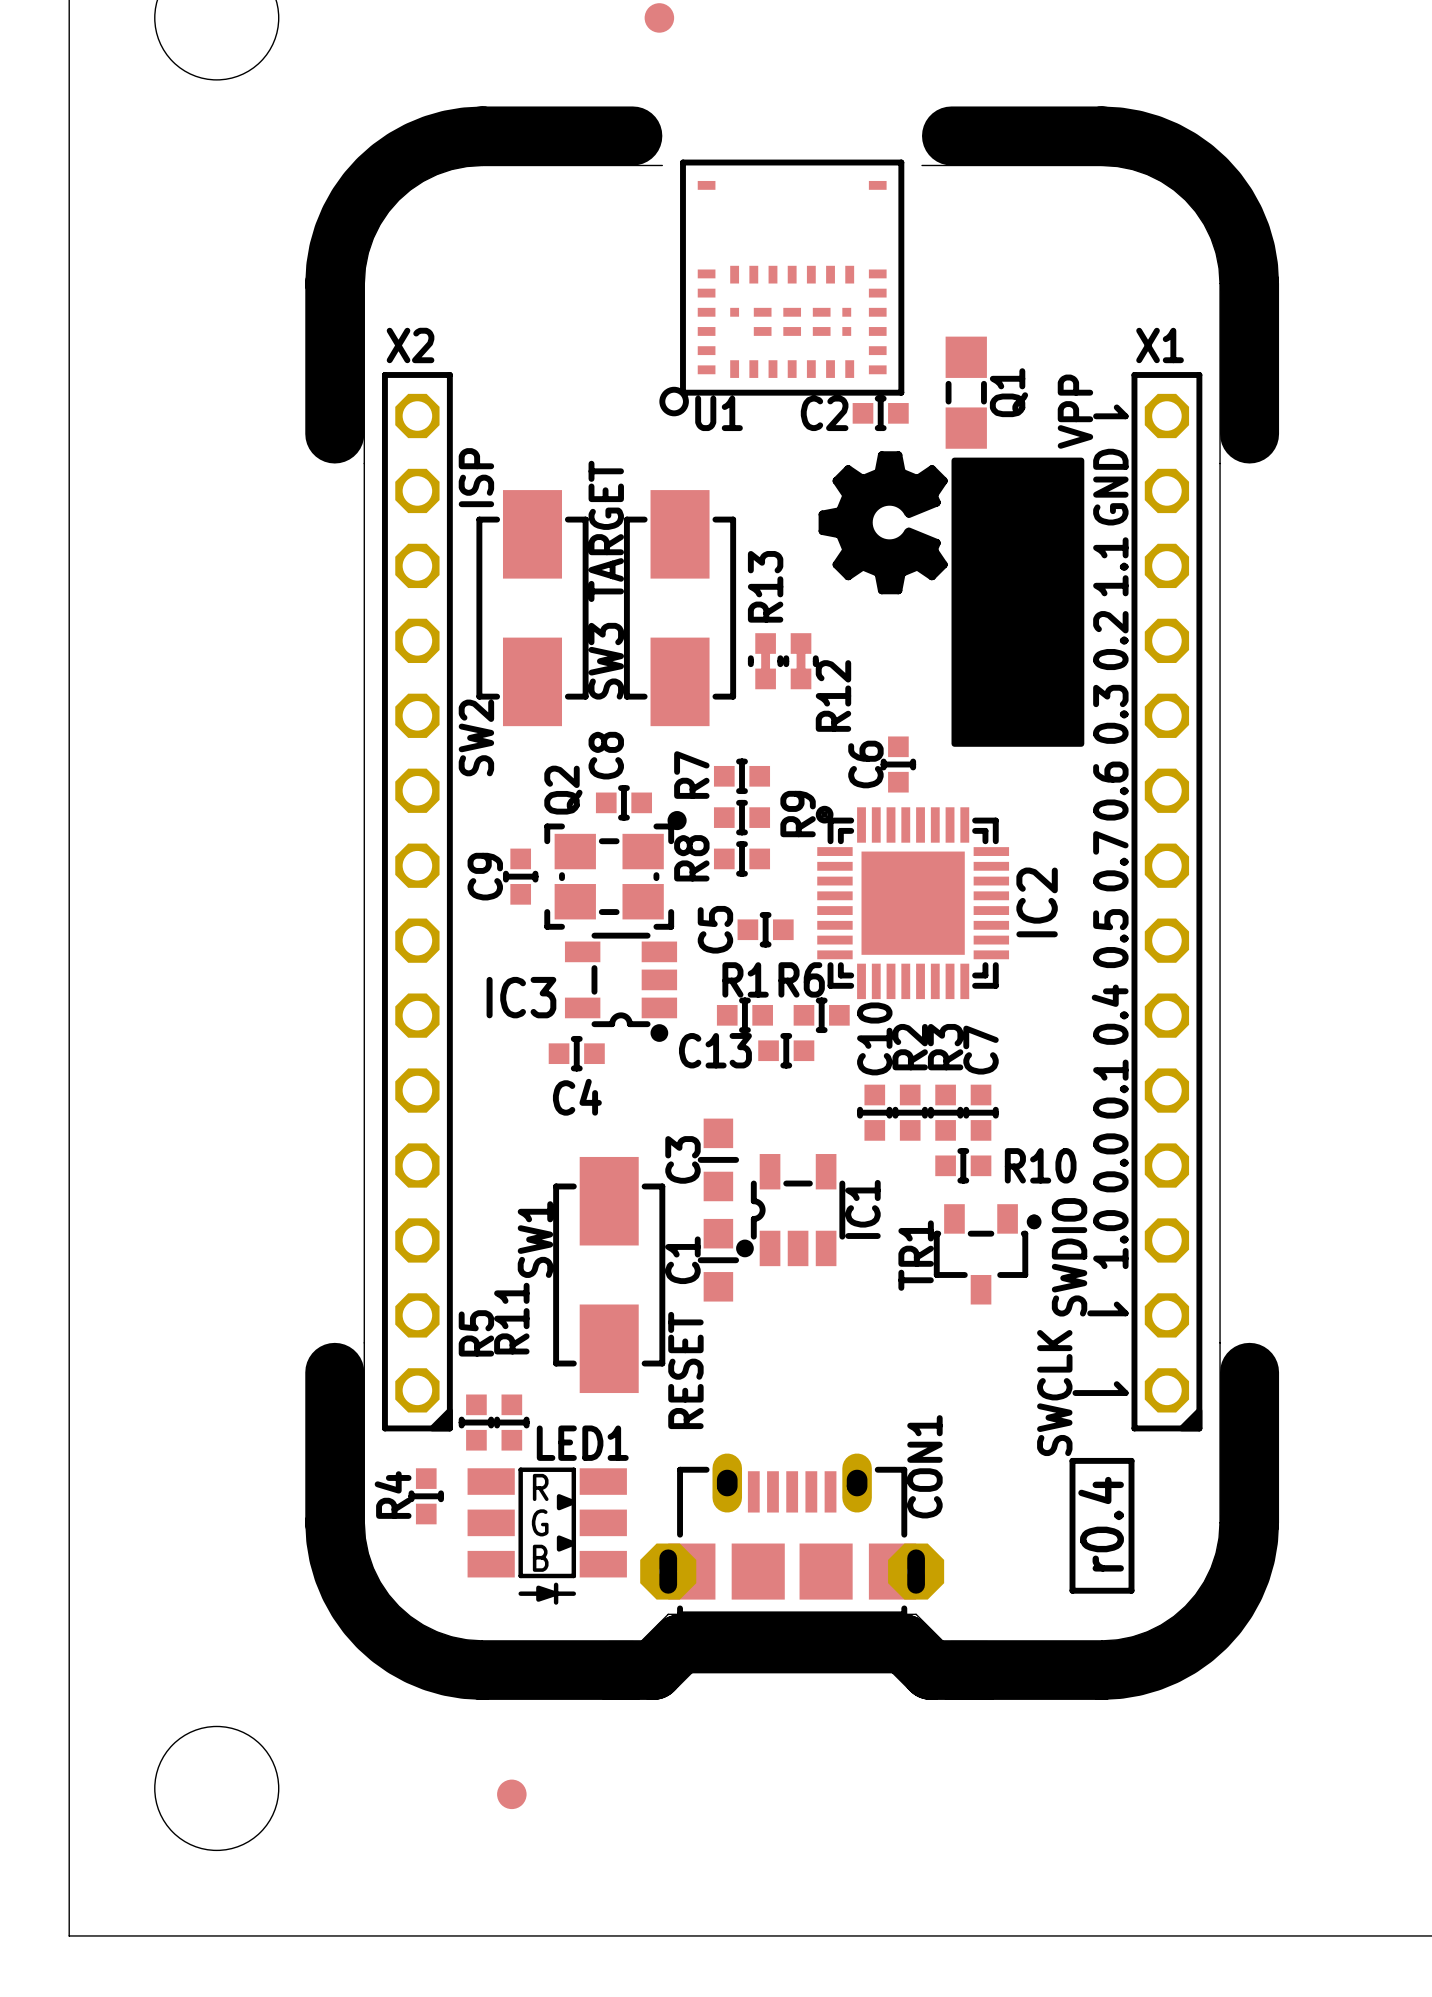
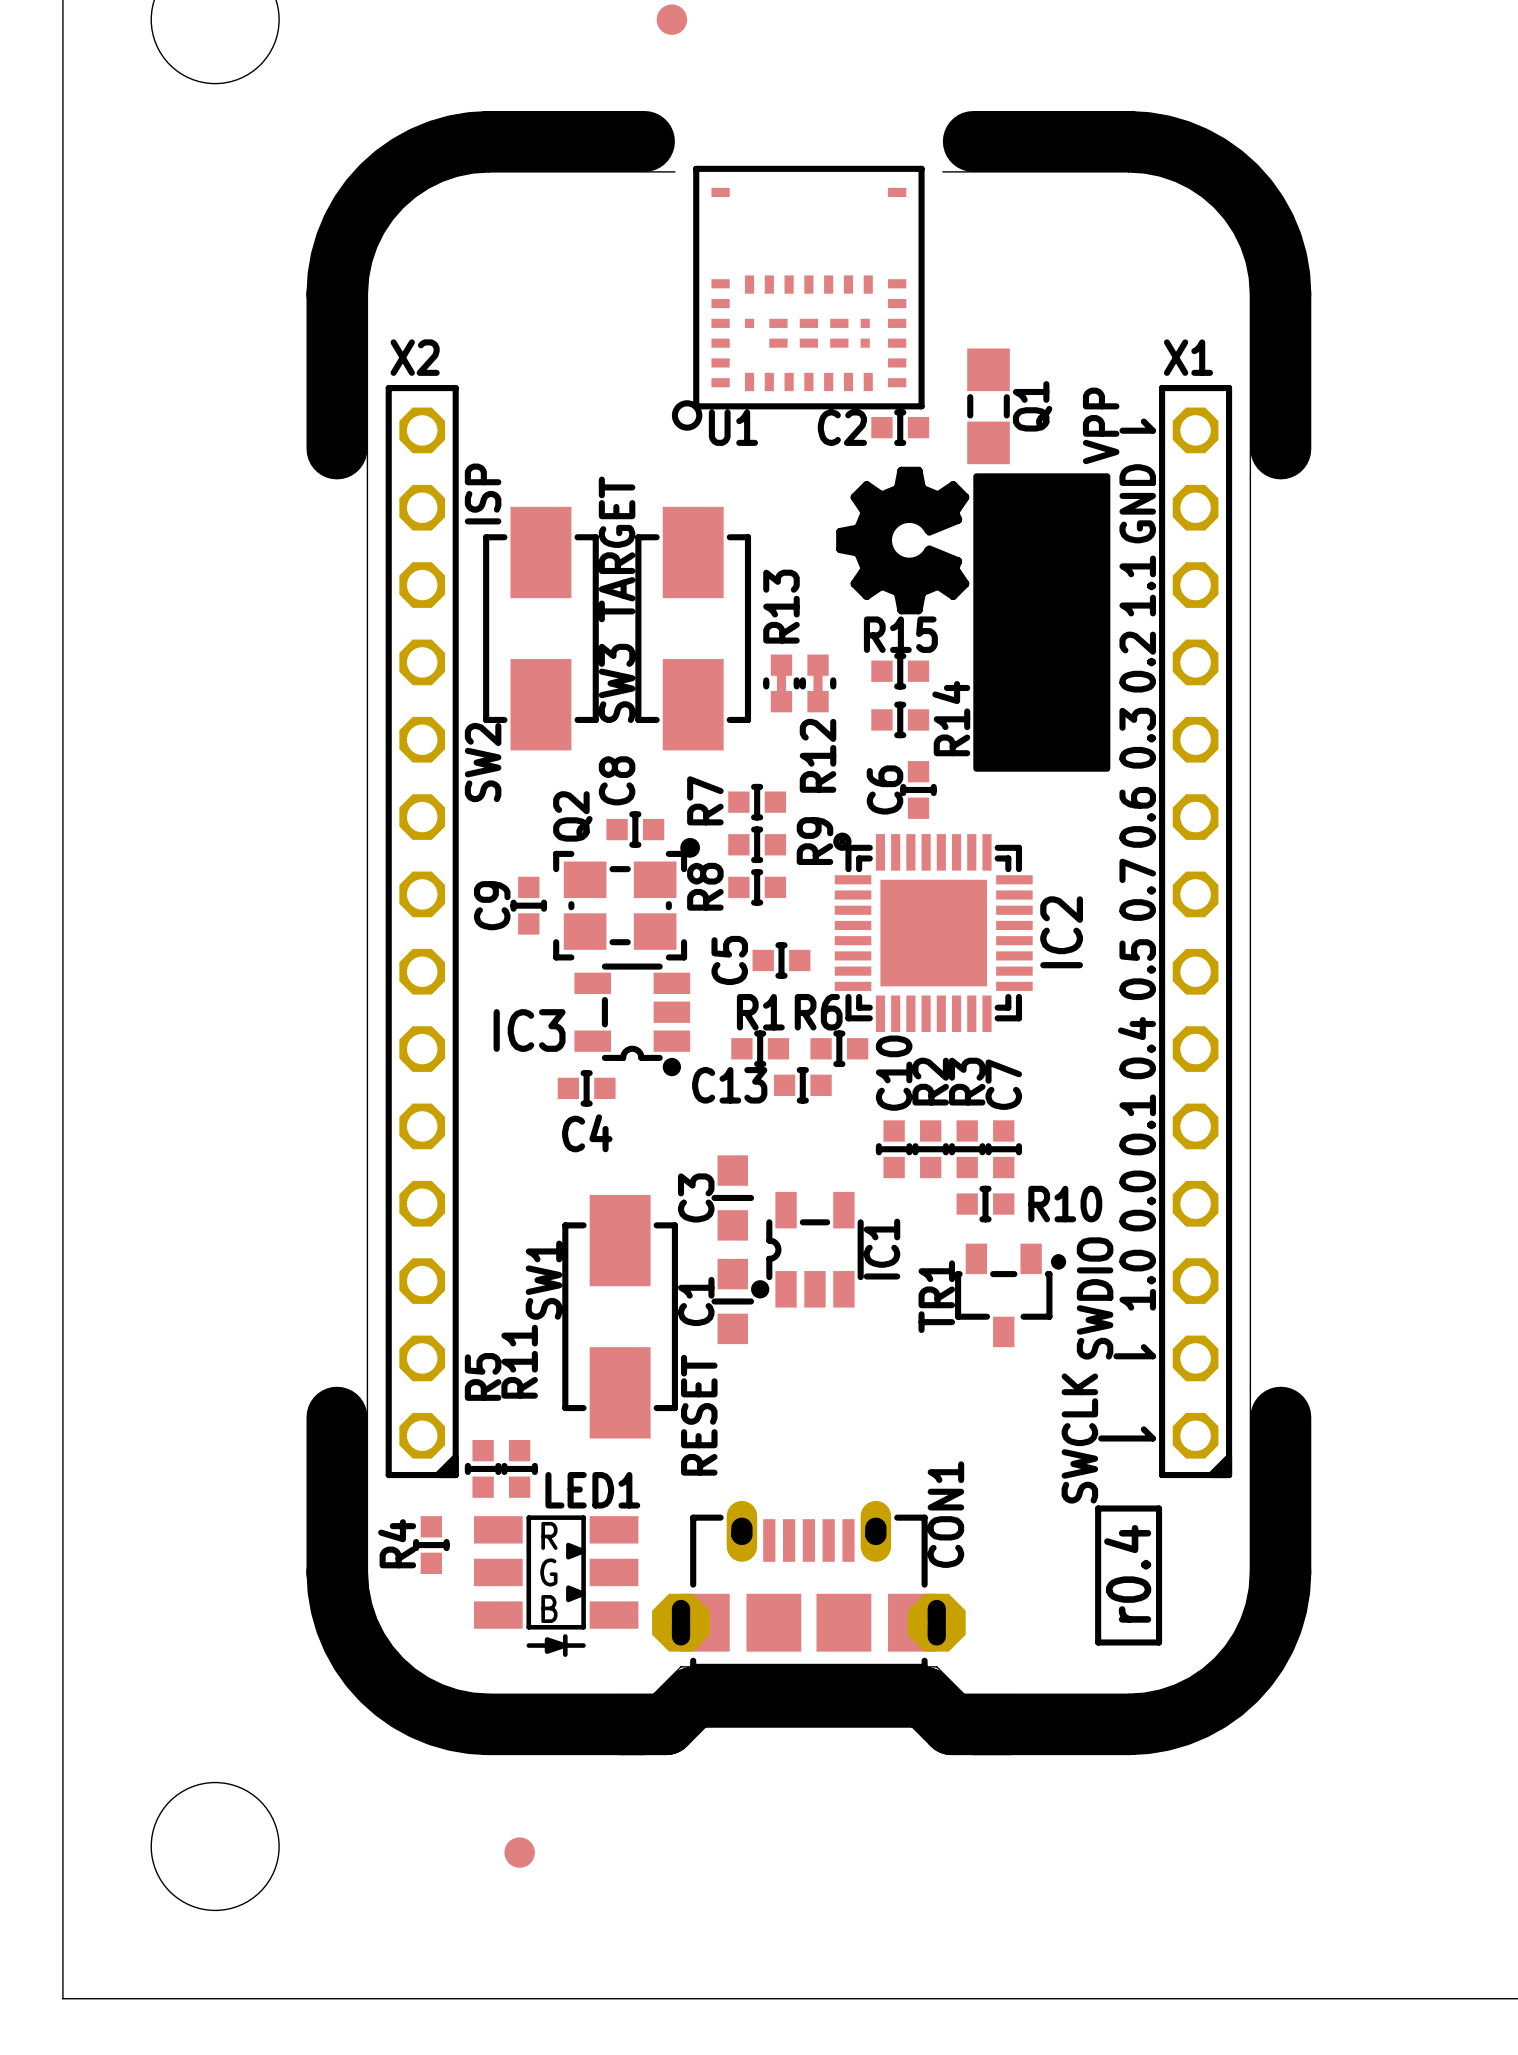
R15: none -> (900, 671)
R12 name position: R12 (833, 695) -> R12 (818, 755)
R14: none -> (900, 719)

